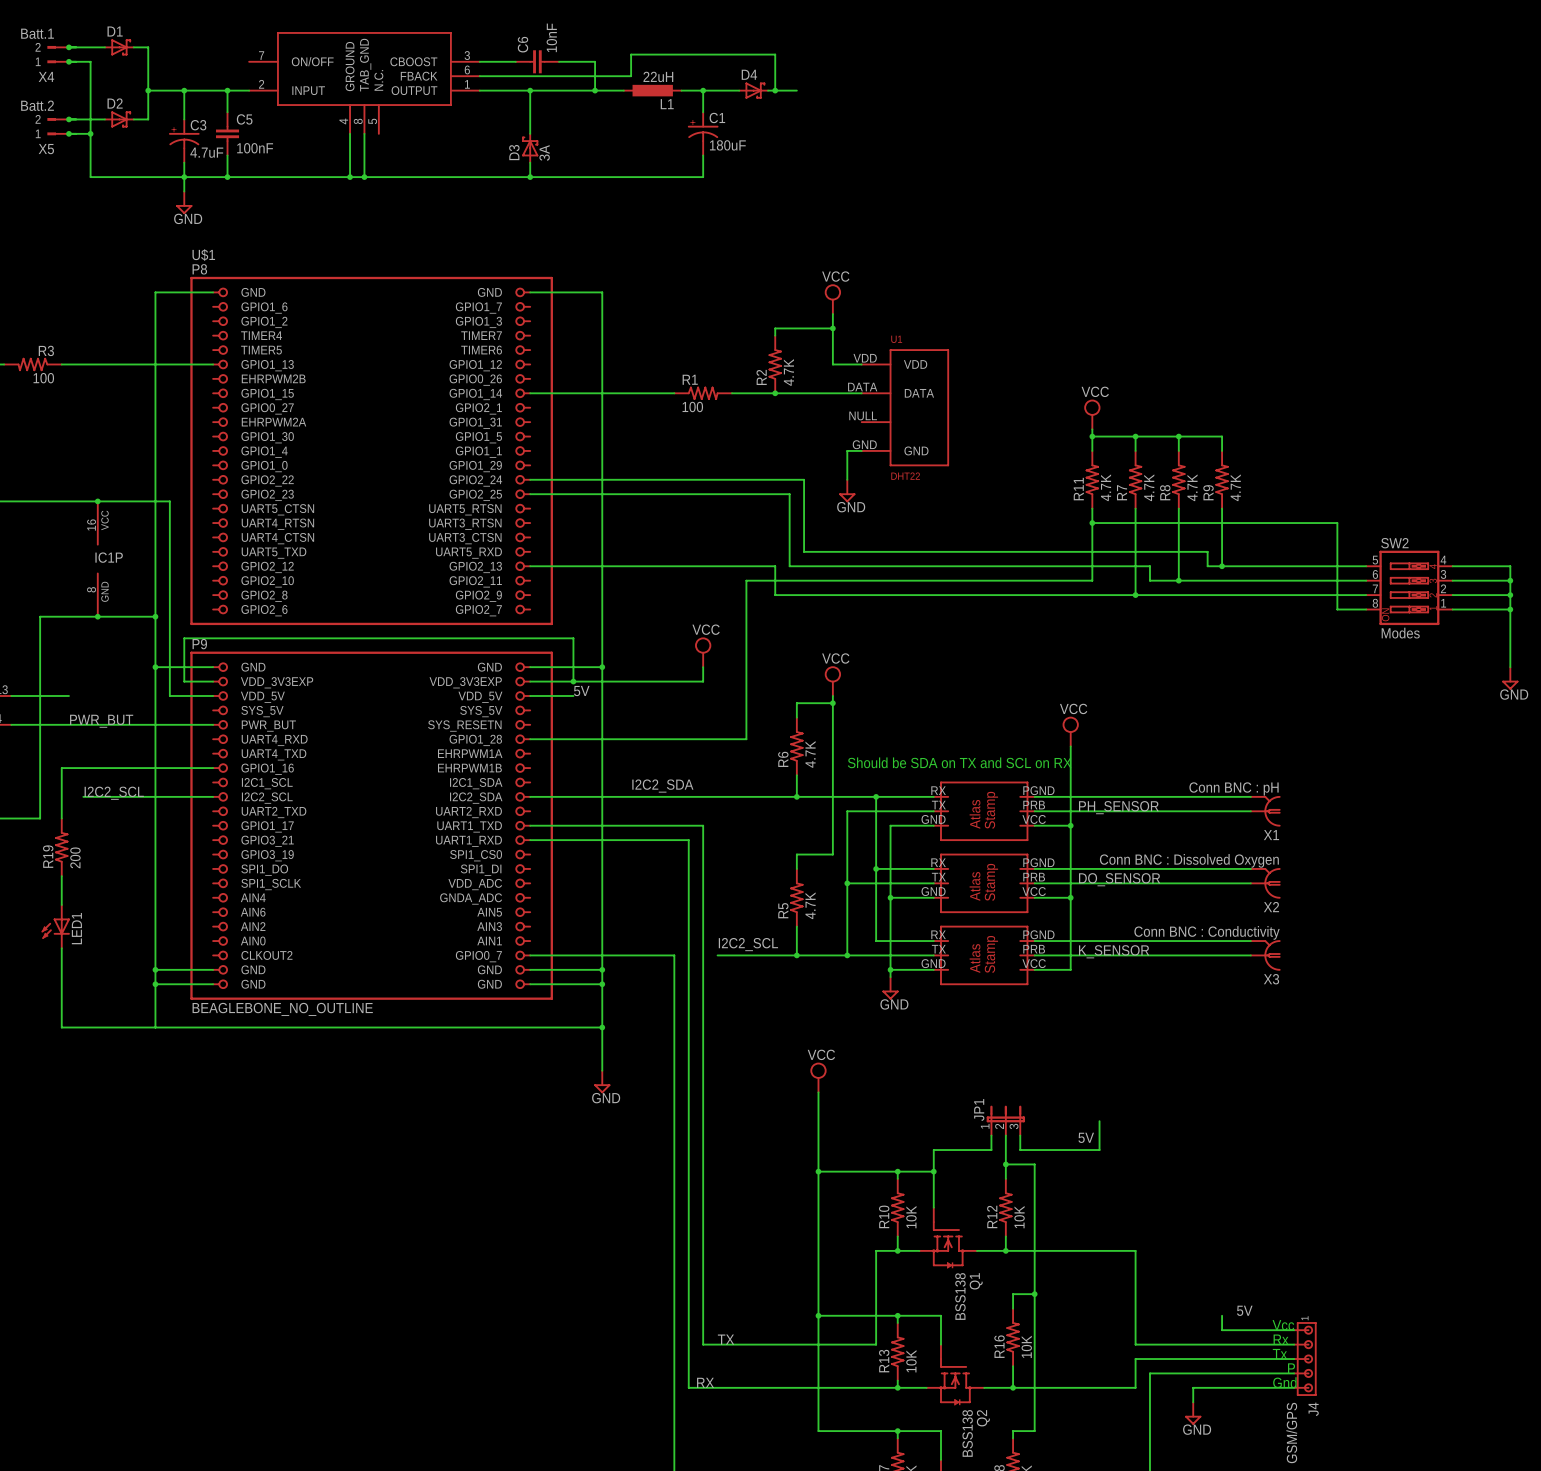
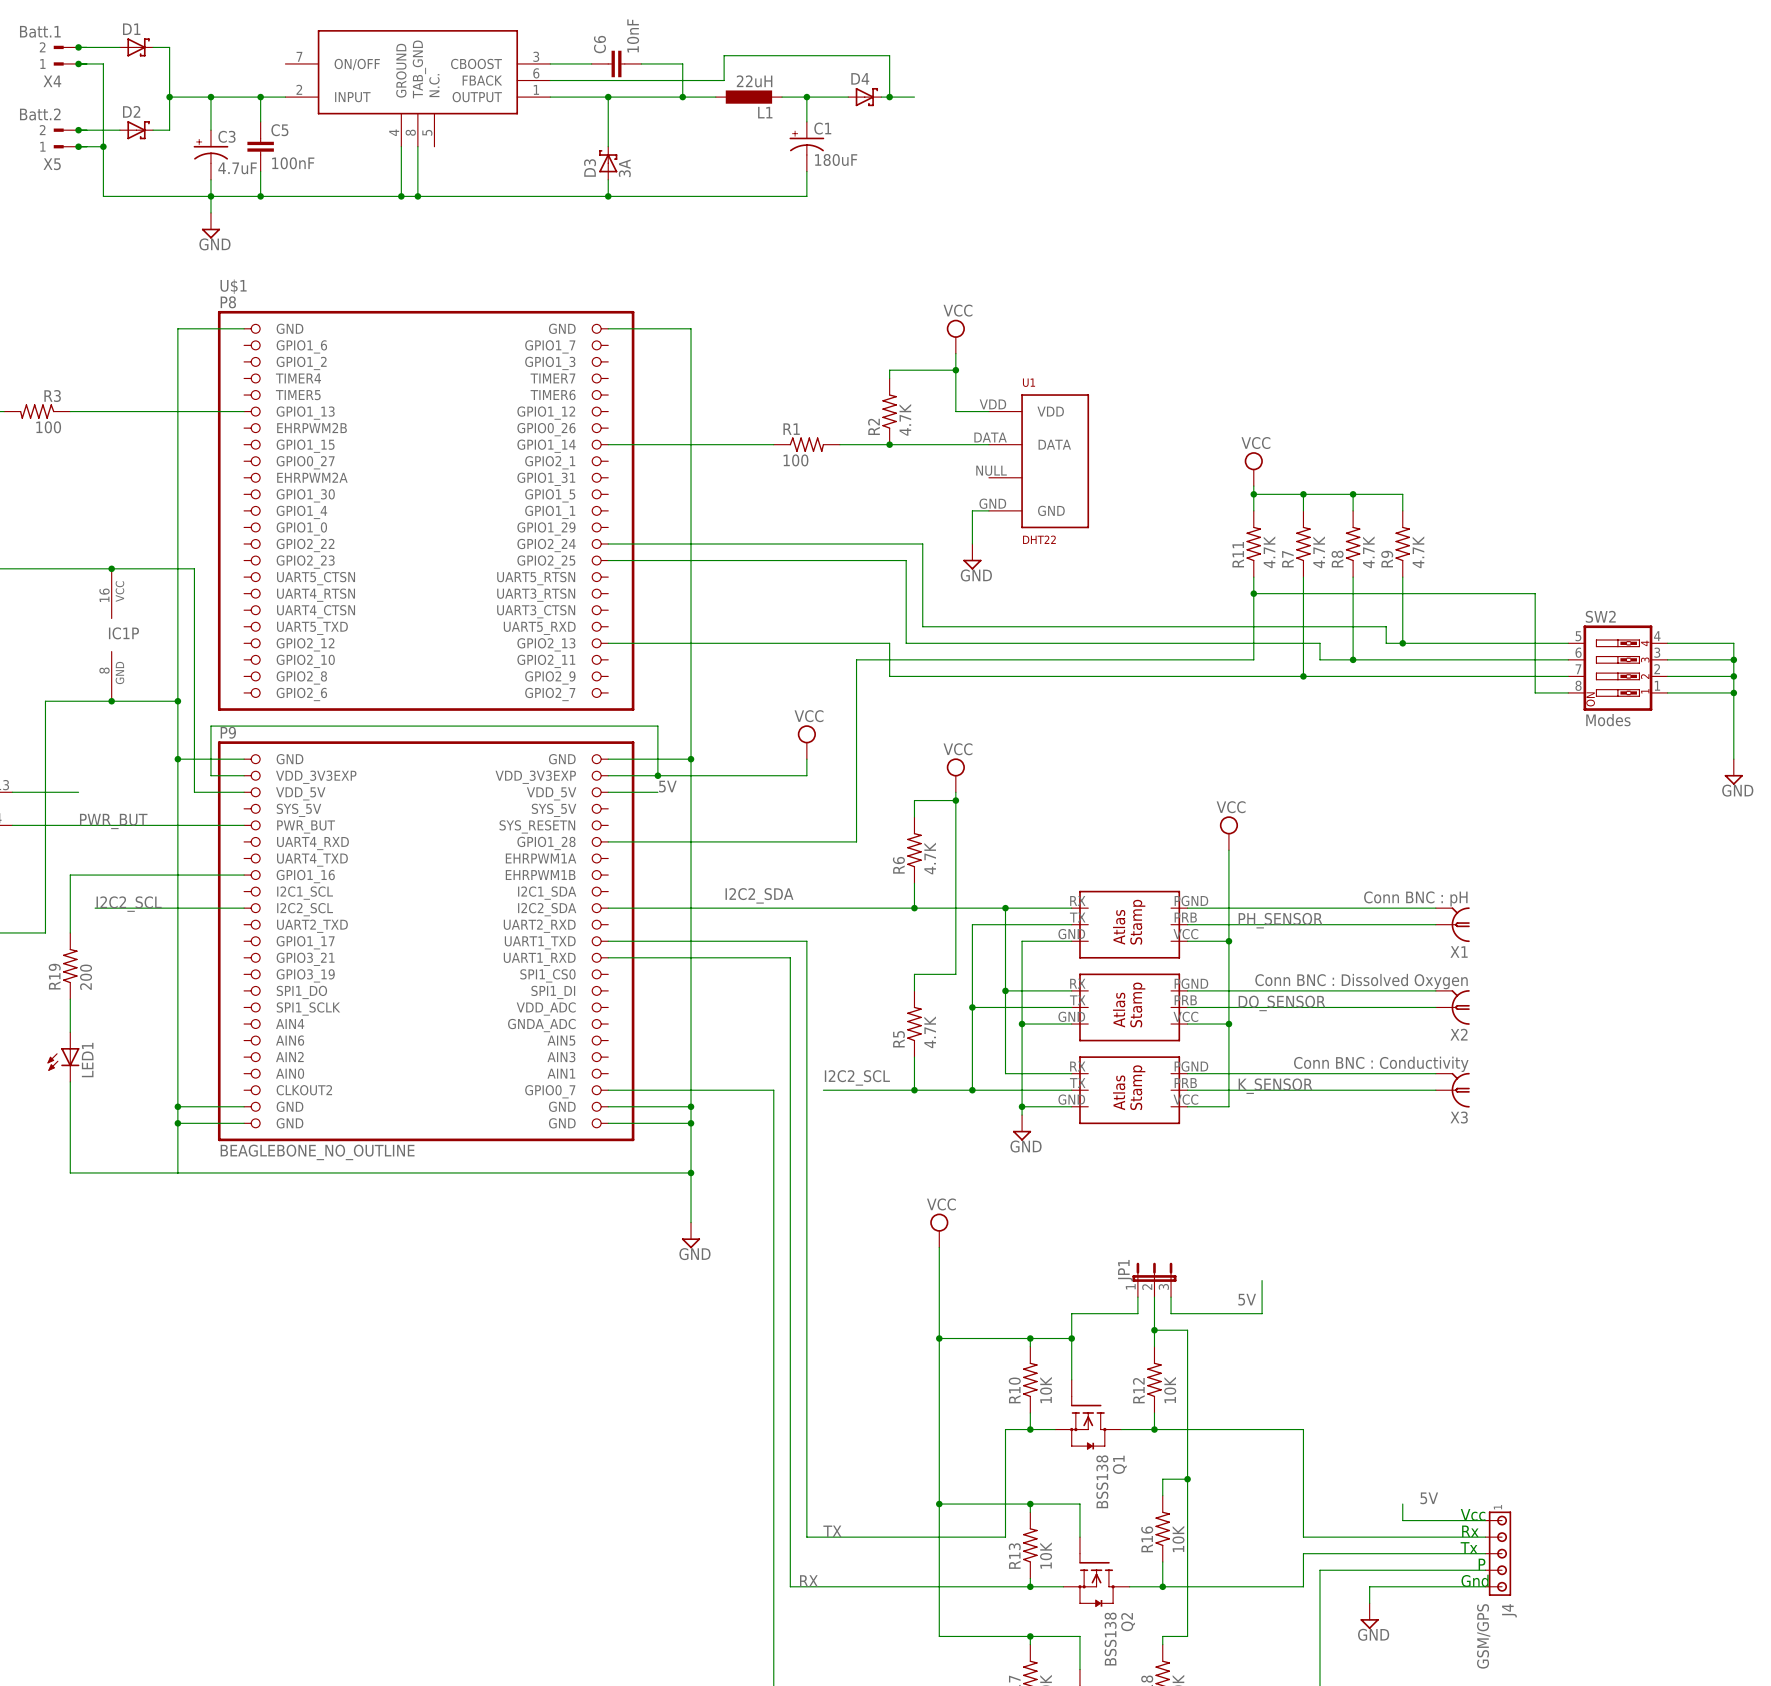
text: Should be SDA on TX and SCL on RX (959, 762) -> none

